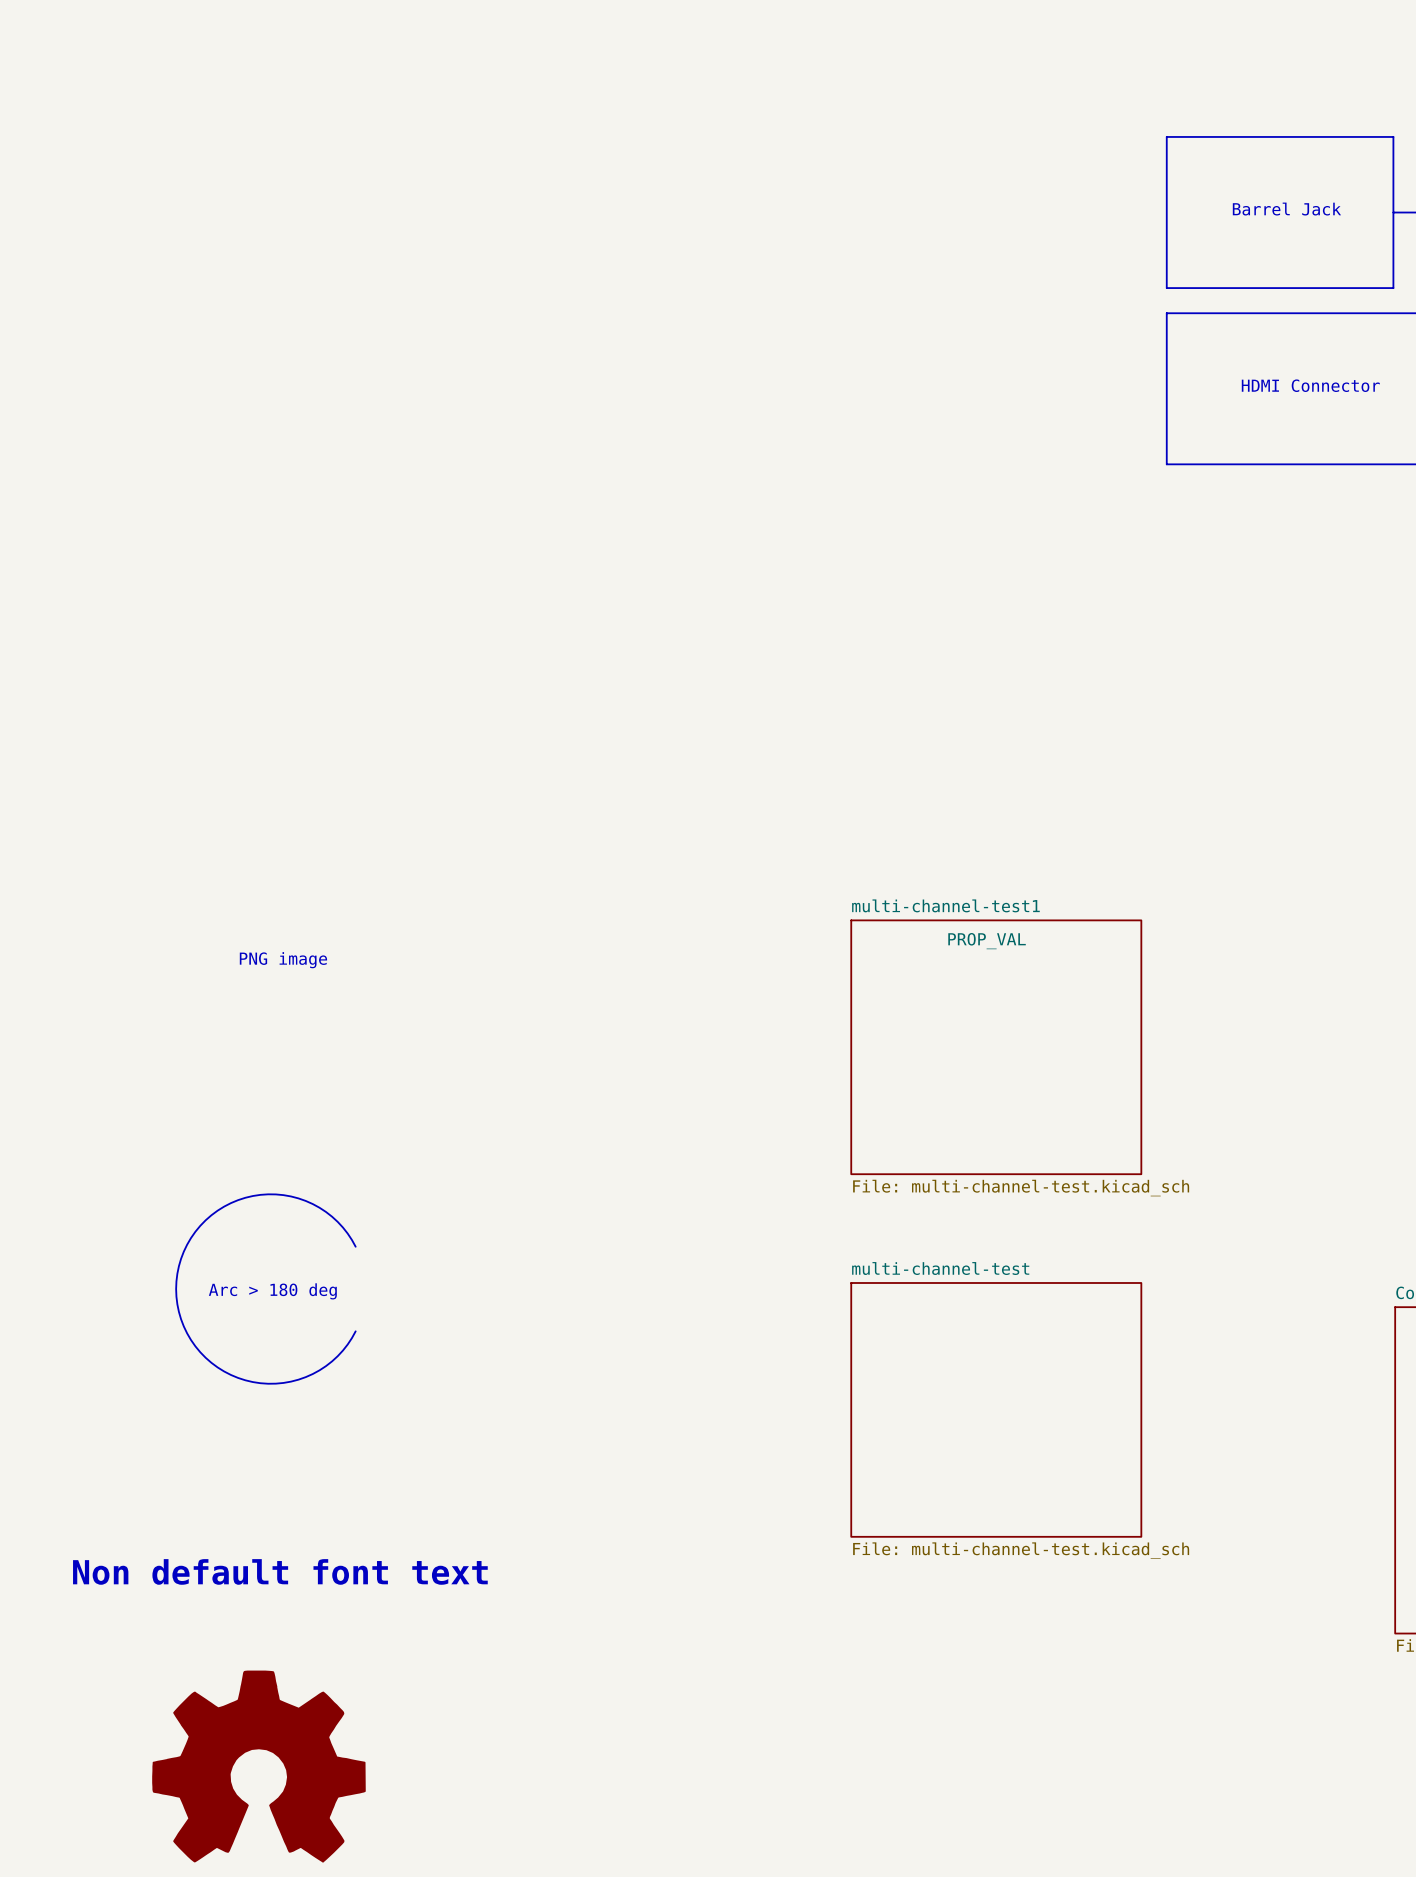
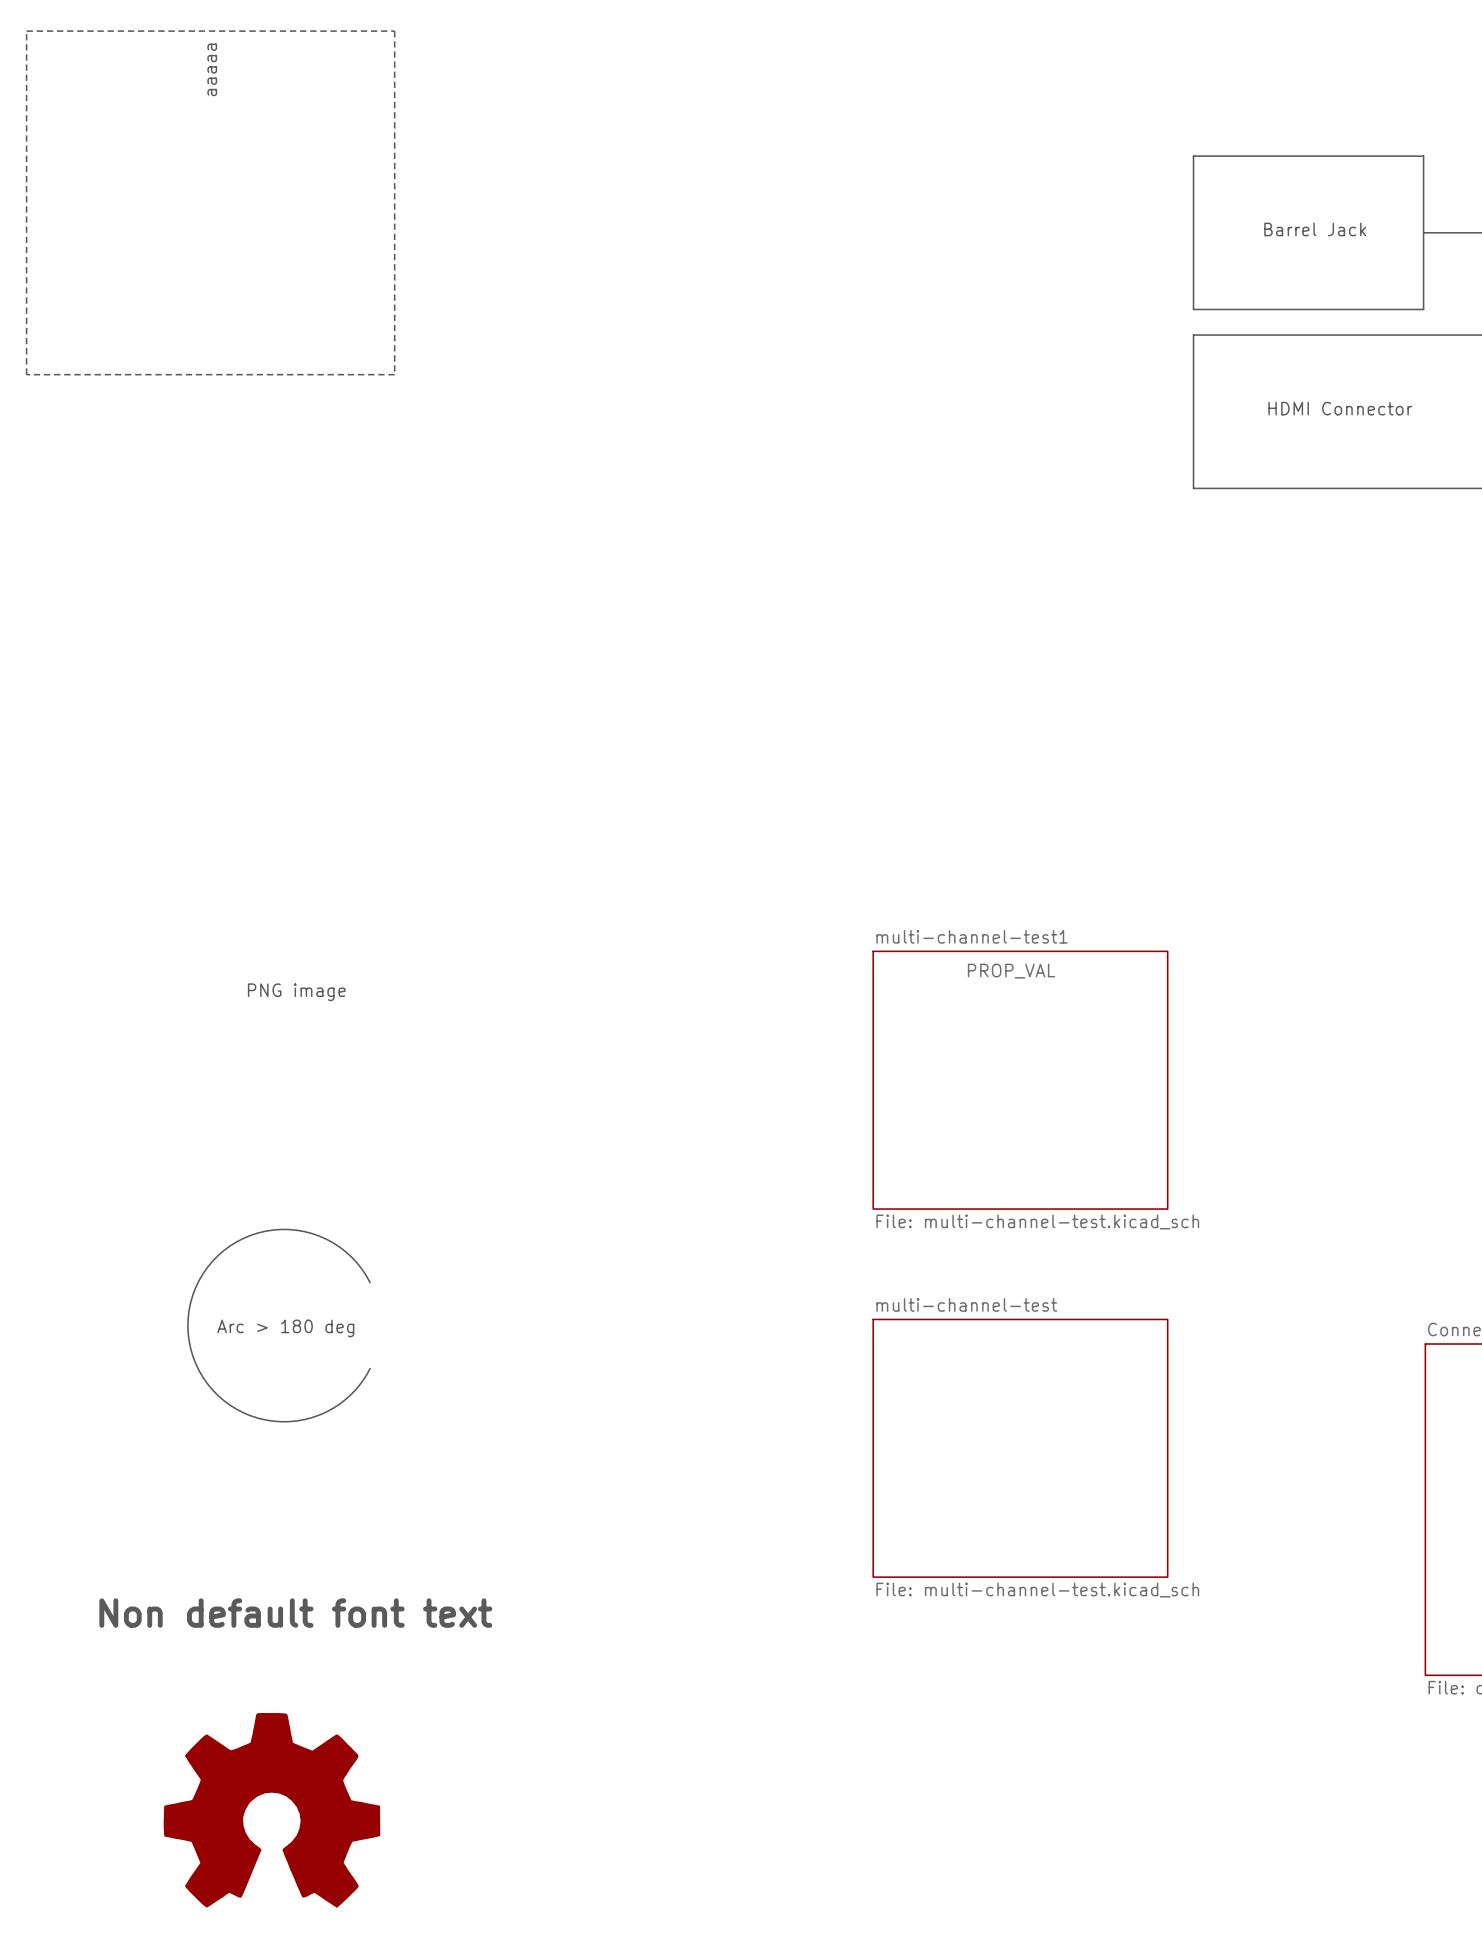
line: none -> (26, 31) (394, 31) (394, 374) (26, 374) (26, 31)
text: none -> aaaaa (212, 69)

